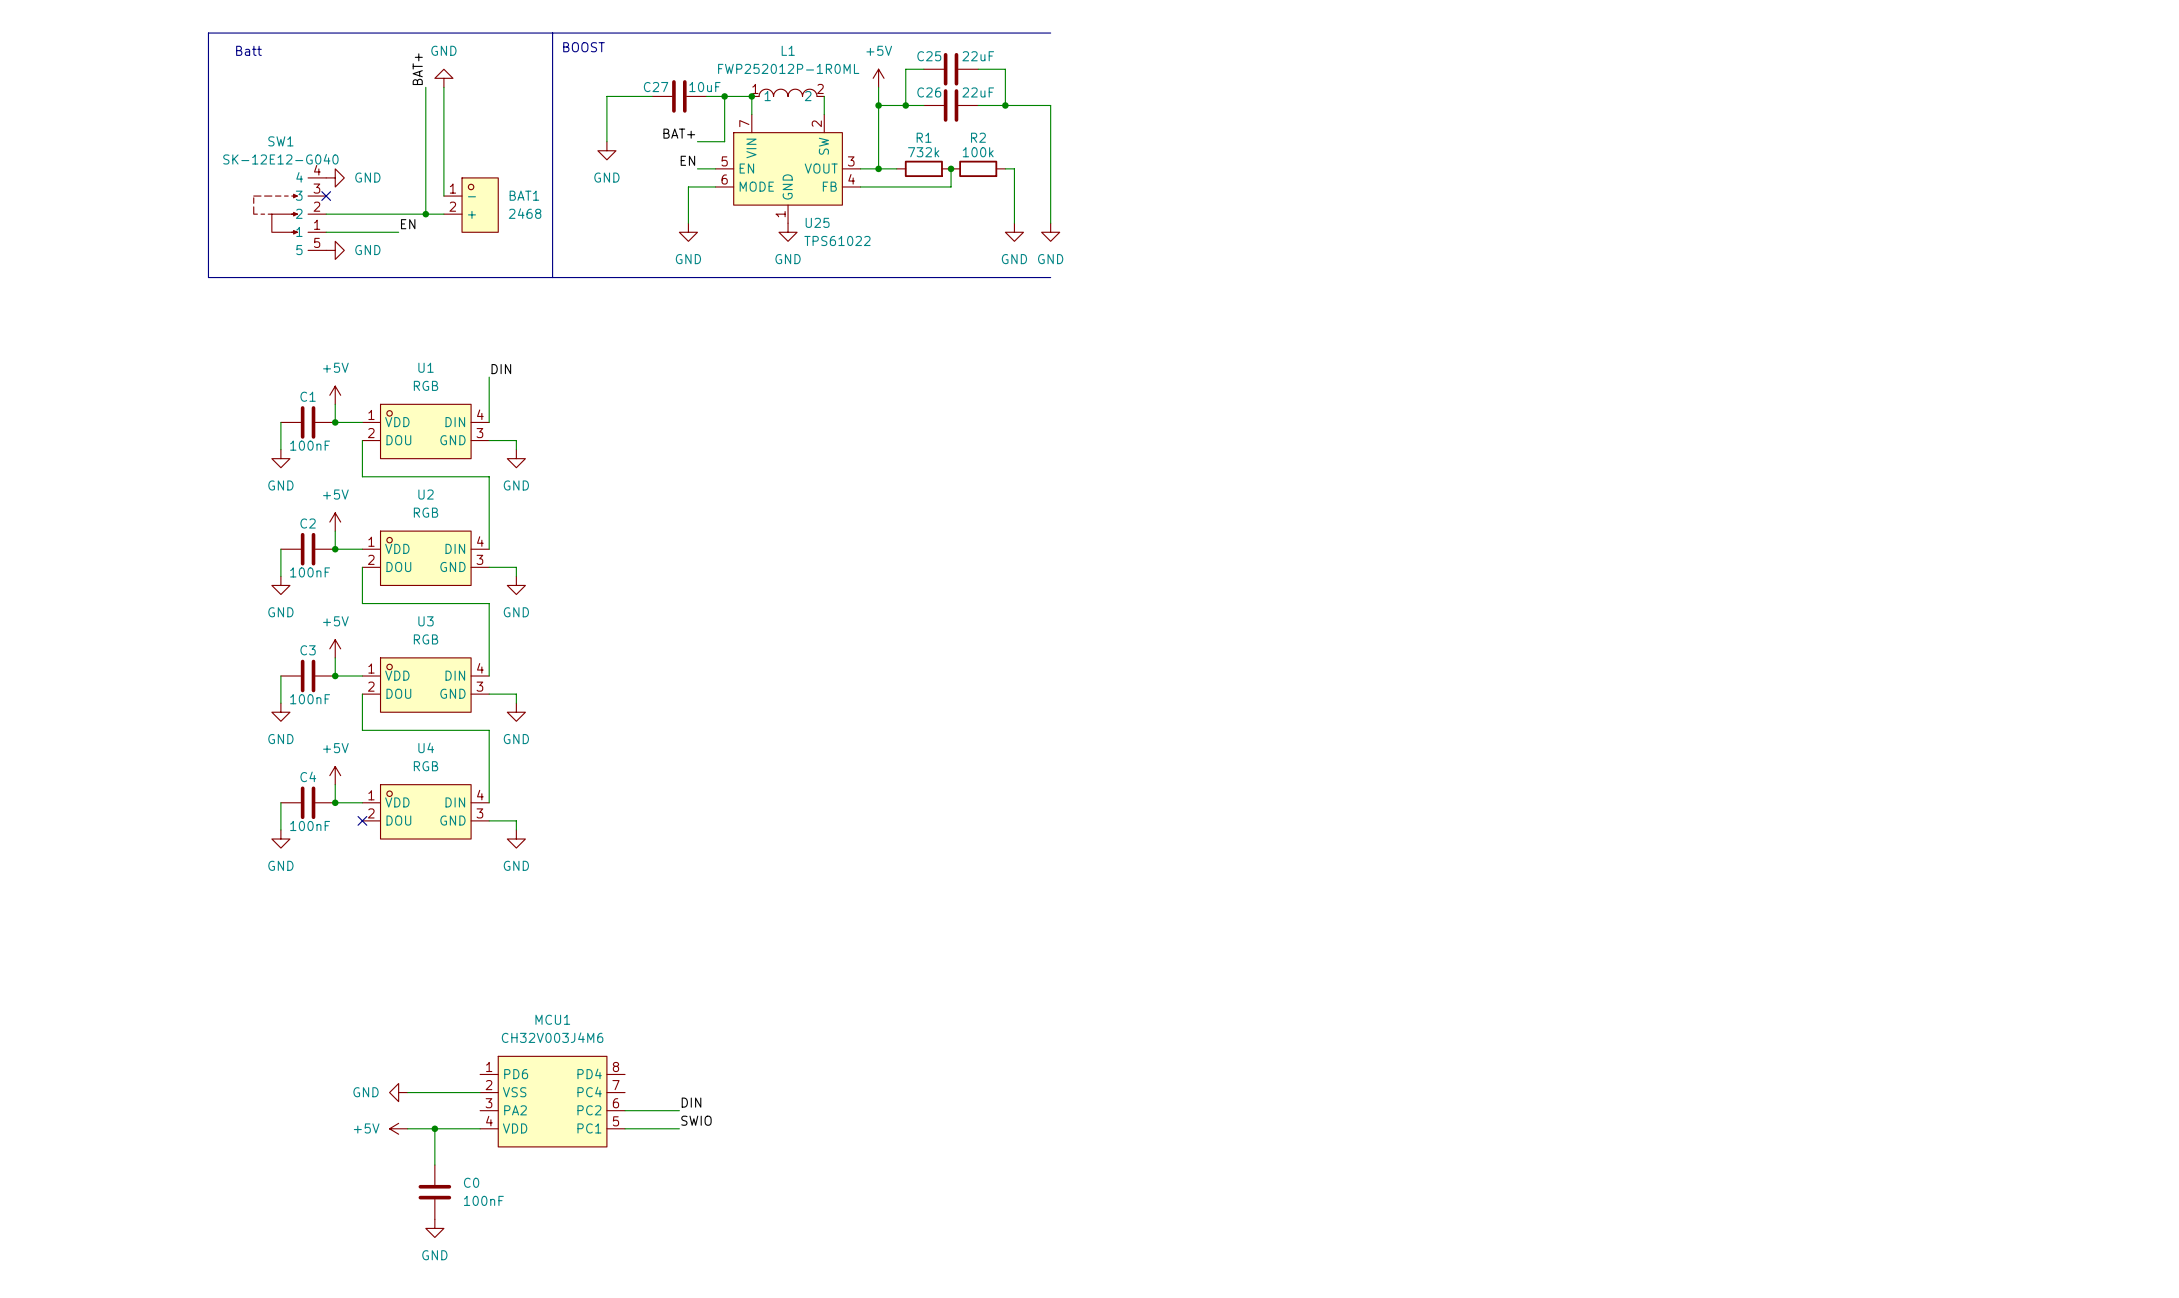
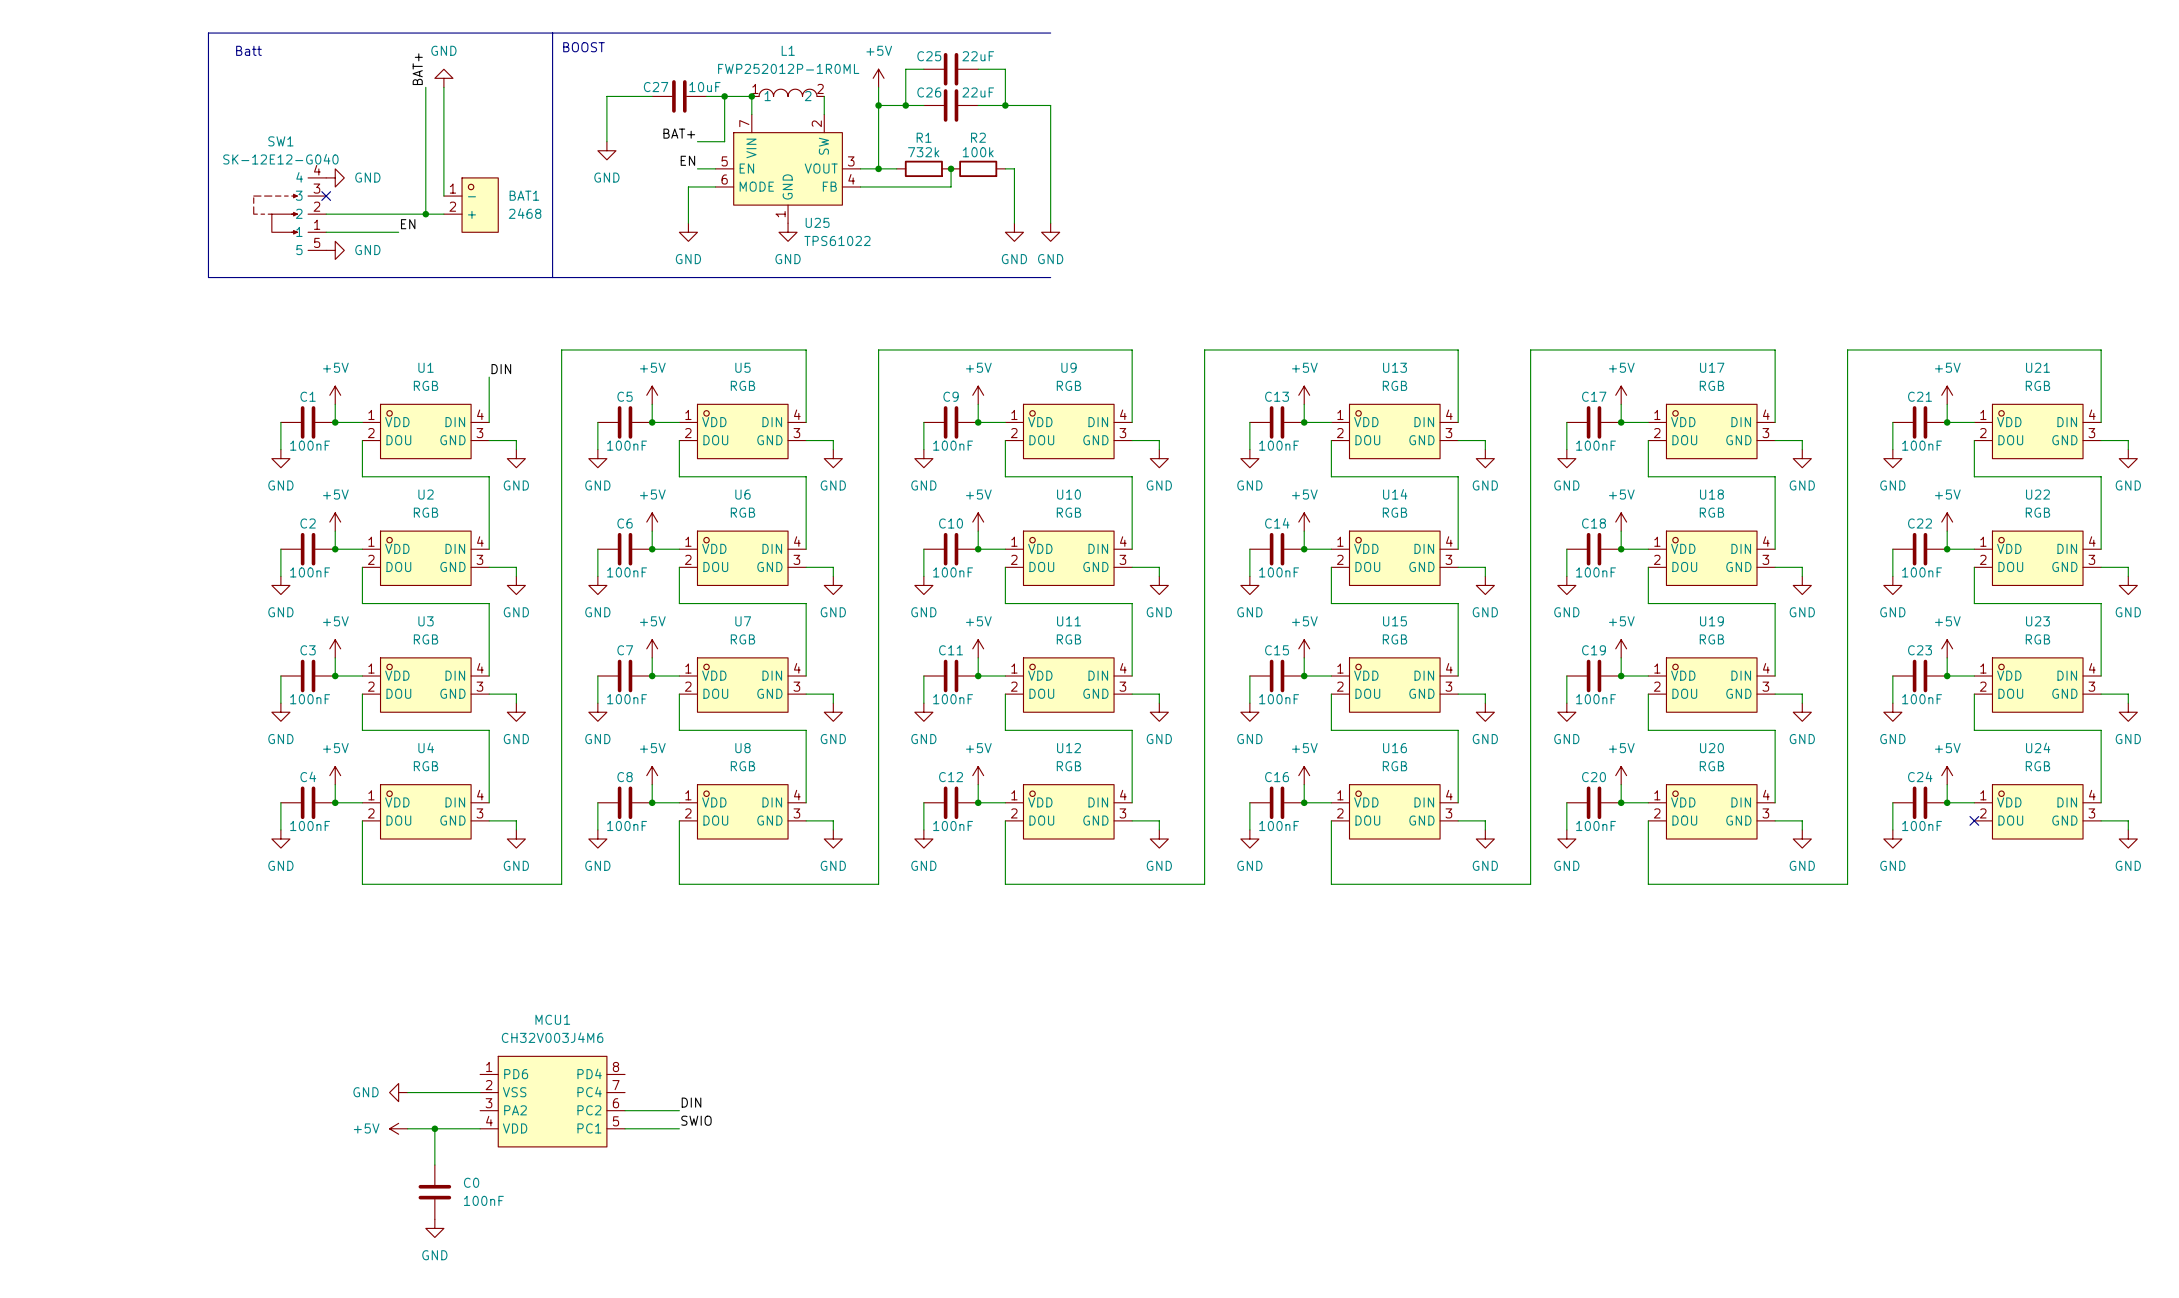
power symbol: none -> +5V (652, 395)
power symbol: none -> +5V (978, 395)
power symbol: none -> +5V (1304, 395)
power symbol: none -> +5V (1621, 395)
power symbol: none -> +5V (1947, 395)
wire: none -> (652, 404) (652, 422) (679, 422)
wire: none -> (978, 404) (978, 422) (1005, 422)
wire: none -> (1304, 404) (1304, 422) (1331, 422)
wire: none -> (1621, 404) (1621, 422) (1648, 422)
wire: none -> (1947, 404) (1947, 422) (1974, 422)
wire: none -> (597, 422) (597, 449)
C5: none -> 100nF (625, 422)
junction: none -> (652, 422)
wire: none -> (806, 422) (806, 349) (561, 349) (561, 884) (362, 884) (362, 820)
wire: none -> (923, 422) (923, 449)
C9: none -> 100nF (951, 422)
junction: none -> (978, 422)
wire: none -> (1132, 422) (1132, 349) (878, 349) (878, 884) (679, 884) (679, 820)
wire: none -> (1249, 422) (1249, 449)
C13: none -> 100nF (1277, 422)
junction: none -> (1304, 422)
wire: none -> (1458, 422) (1458, 349) (1204, 349) (1204, 884) (1005, 884) (1005, 820)
wire: none -> (1566, 422) (1566, 449)
C17: none -> 100nF (1594, 422)
junction: none -> (1621, 422)
wire: none -> (1775, 422) (1775, 349) (1530, 349) (1530, 884) (1331, 884) (1331, 820)
wire: none -> (1892, 422) (1892, 449)
C21: none -> 100nF (1920, 422)
junction: none -> (1947, 422)
wire: none -> (2101, 422) (2101, 349) (1847, 349) (1847, 884) (1648, 884) (1648, 820)
U5: none -> RGB (742, 431)
U9: none -> RGB (1068, 431)
U13: none -> RGB (1394, 431)
U17: none -> RGB (1711, 431)
U21: none -> RGB (2037, 431)
wire: none -> (679, 440) (679, 476) (806, 476) (806, 549)
wire: none -> (806, 440) (833, 440) (833, 449)
wire: none -> (1005, 440) (1005, 476) (1132, 476) (1132, 549)
wire: none -> (1132, 440) (1159, 440) (1159, 449)
wire: none -> (1331, 440) (1331, 476) (1458, 476) (1458, 549)
wire: none -> (1458, 440) (1485, 440) (1485, 449)
wire: none -> (1648, 440) (1648, 476) (1775, 476) (1775, 549)
wire: none -> (1775, 440) (1802, 440) (1802, 449)
wire: none -> (1974, 440) (1974, 476) (2101, 476) (2101, 549)
wire: none -> (2101, 440) (2128, 440) (2128, 449)
power symbol: none -> GND (597, 458)
power symbol: none -> GND (833, 458)
power symbol: none -> GND (923, 458)
power symbol: none -> GND (1159, 458)
power symbol: none -> GND (1249, 458)
power symbol: none -> GND (1485, 458)
power symbol: none -> GND (1566, 458)
power symbol: none -> GND (1802, 458)
power symbol: none -> GND (1892, 458)
power symbol: none -> GND (2128, 458)
power symbol: none -> +5V (652, 522)
power symbol: none -> +5V (978, 522)
power symbol: none -> +5V (1304, 522)
power symbol: none -> +5V (1621, 522)
power symbol: none -> +5V (1947, 522)
wire: none -> (652, 531) (652, 549) (679, 549)
wire: none -> (978, 531) (978, 549) (1005, 549)
wire: none -> (1304, 531) (1304, 549) (1331, 549)
wire: none -> (1621, 531) (1621, 549) (1648, 549)
wire: none -> (1947, 531) (1947, 549) (1974, 549)
wire: none -> (597, 549) (597, 576)
C6: none -> 100nF (625, 549)
junction: none -> (652, 549)
wire: none -> (923, 549) (923, 576)
C10: none -> 100nF (951, 549)
junction: none -> (978, 549)
wire: none -> (1249, 549) (1249, 576)
C14: none -> 100nF (1277, 549)
junction: none -> (1304, 549)
wire: none -> (1566, 549) (1566, 576)
C18: none -> 100nF (1594, 549)
junction: none -> (1621, 549)
wire: none -> (1892, 549) (1892, 576)
C22: none -> 100nF (1920, 549)
junction: none -> (1947, 549)
U6: none -> RGB (742, 558)
U10: none -> RGB (1068, 558)
U14: none -> RGB (1394, 558)
U18: none -> RGB (1711, 558)
U22: none -> RGB (2037, 558)
wire: none -> (679, 567) (679, 603) (806, 603) (806, 676)
wire: none -> (806, 567) (833, 567) (833, 576)
wire: none -> (1005, 567) (1005, 603) (1132, 603) (1132, 676)
wire: none -> (1132, 567) (1159, 567) (1159, 576)
wire: none -> (1331, 567) (1331, 603) (1458, 603) (1458, 676)
wire: none -> (1458, 567) (1485, 567) (1485, 576)
wire: none -> (1648, 567) (1648, 603) (1775, 603) (1775, 676)
wire: none -> (1775, 567) (1802, 567) (1802, 576)
wire: none -> (1974, 567) (1974, 603) (2101, 603) (2101, 676)
wire: none -> (2101, 567) (2128, 567) (2128, 576)
power symbol: none -> GND (597, 585)
power symbol: none -> GND (833, 585)
power symbol: none -> GND (923, 585)
power symbol: none -> GND (1159, 585)
power symbol: none -> GND (1249, 585)
power symbol: none -> GND (1485, 585)
power symbol: none -> GND (1566, 585)
power symbol: none -> GND (1802, 585)
power symbol: none -> GND (1892, 585)
power symbol: none -> GND (2128, 585)
power symbol: none -> +5V (652, 648)
power symbol: none -> +5V (978, 648)
power symbol: none -> +5V (1304, 648)
power symbol: none -> +5V (1621, 648)
power symbol: none -> +5V (1947, 648)
wire: none -> (652, 657) (652, 676) (679, 676)
wire: none -> (978, 657) (978, 676) (1005, 676)
wire: none -> (1304, 657) (1304, 676) (1331, 676)
wire: none -> (1621, 657) (1621, 676) (1648, 676)
wire: none -> (1947, 657) (1947, 676) (1974, 676)
wire: none -> (597, 676) (597, 703)
C7: none -> 100nF (625, 676)
junction: none -> (652, 676)
wire: none -> (923, 676) (923, 703)
C11: none -> 100nF (951, 676)
junction: none -> (978, 676)
wire: none -> (1249, 676) (1249, 703)
C15: none -> 100nF (1277, 676)
junction: none -> (1304, 676)
wire: none -> (1566, 676) (1566, 703)
C19: none -> 100nF (1594, 676)
junction: none -> (1621, 676)
wire: none -> (1892, 676) (1892, 703)
C23: none -> 100nF (1920, 676)
junction: none -> (1947, 676)
U7: none -> RGB (742, 685)
U11: none -> RGB (1068, 685)
U15: none -> RGB (1394, 685)
U19: none -> RGB (1711, 685)
U23: none -> RGB (2037, 685)
wire: none -> (679, 694) (679, 730) (806, 730) (806, 802)
wire: none -> (806, 694) (833, 694) (833, 703)
wire: none -> (1005, 694) (1005, 730) (1132, 730) (1132, 802)
wire: none -> (1132, 694) (1159, 694) (1159, 703)
wire: none -> (1331, 694) (1331, 730) (1458, 730) (1458, 802)
wire: none -> (1458, 694) (1485, 694) (1485, 703)
wire: none -> (1648, 694) (1648, 730) (1775, 730) (1775, 802)
wire: none -> (1775, 694) (1802, 694) (1802, 703)
wire: none -> (1974, 694) (1974, 730) (2101, 730) (2101, 802)
wire: none -> (2101, 694) (2128, 694) (2128, 703)
power symbol: none -> GND (597, 712)
power symbol: none -> GND (833, 712)
power symbol: none -> GND (923, 712)
power symbol: none -> GND (1159, 712)
power symbol: none -> GND (1249, 712)
power symbol: none -> GND (1485, 712)
power symbol: none -> GND (1566, 712)
power symbol: none -> GND (1802, 712)
power symbol: none -> GND (1892, 712)
power symbol: none -> GND (2128, 712)
power symbol: none -> +5V (652, 775)
power symbol: none -> +5V (978, 775)
power symbol: none -> +5V (1304, 775)
power symbol: none -> +5V (1621, 775)
power symbol: none -> +5V (1947, 775)
wire: none -> (652, 784) (652, 802) (679, 802)
wire: none -> (978, 784) (978, 802) (1005, 802)
wire: none -> (1304, 784) (1304, 802) (1331, 802)
wire: none -> (1621, 784) (1621, 802) (1648, 802)
wire: none -> (1947, 784) (1947, 802) (1974, 802)
wire: none -> (597, 802) (597, 829)
C8: none -> 100nF (625, 802)
junction: none -> (652, 802)
wire: none -> (923, 802) (923, 829)
C12: none -> 100nF (951, 802)
junction: none -> (978, 802)
wire: none -> (1249, 802) (1249, 829)
C16: none -> 100nF (1277, 802)
junction: none -> (1304, 802)
wire: none -> (1566, 802) (1566, 829)
C20: none -> 100nF (1594, 802)
junction: none -> (1621, 802)
wire: none -> (1892, 802) (1892, 829)
C24: none -> 100nF (1920, 802)
junction: none -> (1947, 802)
U8: none -> RGB (742, 811)
U12: none -> RGB (1068, 811)
U16: none -> RGB (1394, 811)
U20: none -> RGB (1711, 811)
U24: none -> RGB (2037, 811)
no-connect mark: (362, 820) -> none
wire: none -> (806, 820) (833, 820) (833, 829)
wire: none -> (1132, 820) (1159, 820) (1159, 829)
wire: none -> (1458, 820) (1485, 820) (1485, 829)
wire: none -> (1775, 820) (1802, 820) (1802, 829)
no-connect mark: none -> (1974, 820)
wire: none -> (2101, 820) (2128, 820) (2128, 829)
power symbol: none -> GND (597, 839)
power symbol: none -> GND (833, 839)
power symbol: none -> GND (923, 839)
power symbol: none -> GND (1159, 839)
power symbol: none -> GND (1249, 839)
power symbol: none -> GND (1485, 839)
power symbol: none -> GND (1566, 839)
power symbol: none -> GND (1802, 839)
power symbol: none -> GND (1892, 839)
power symbol: none -> GND (2128, 839)

